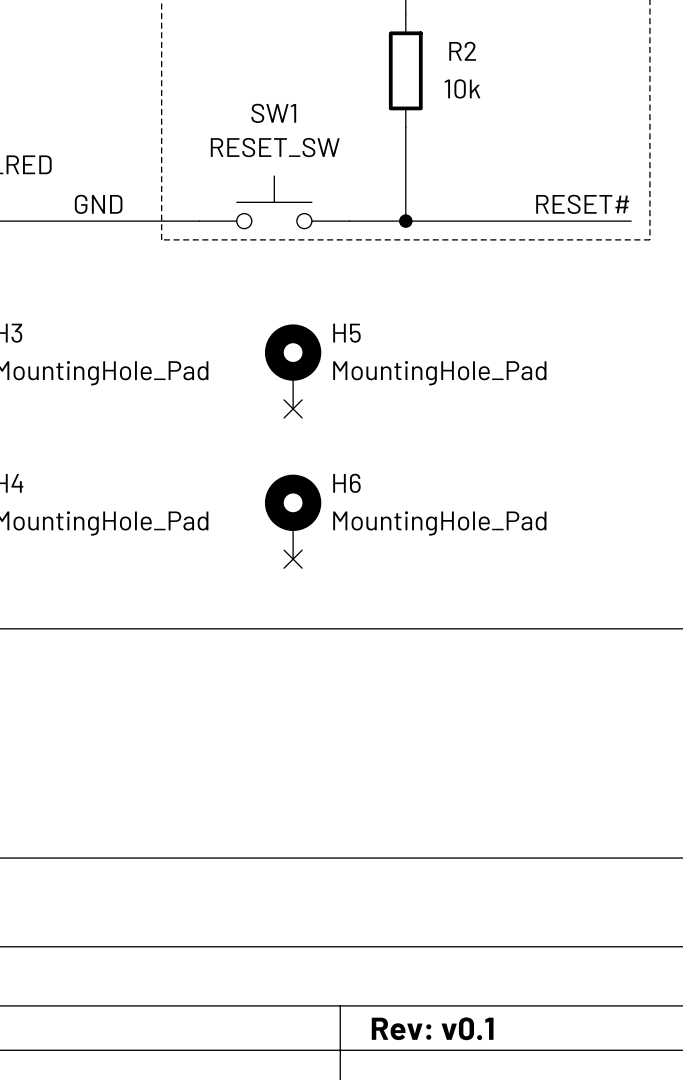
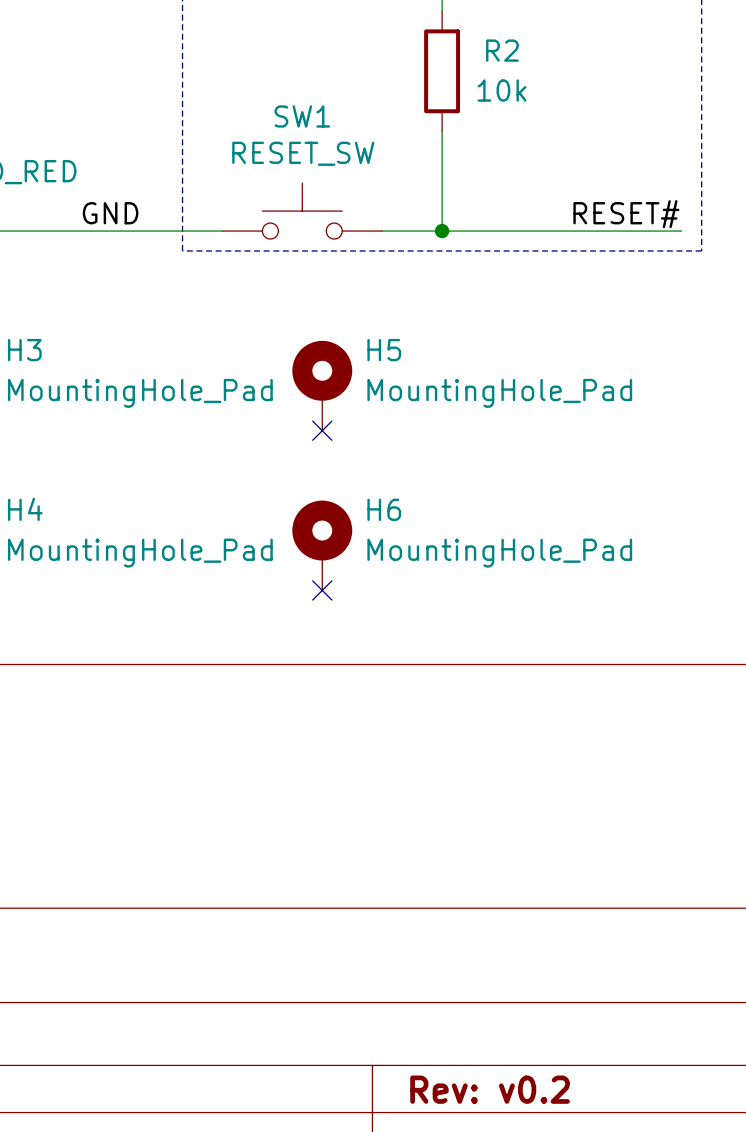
title block: Rev: v0.1 (432, 1028) -> Rev: v0.2 (490, 1089)

